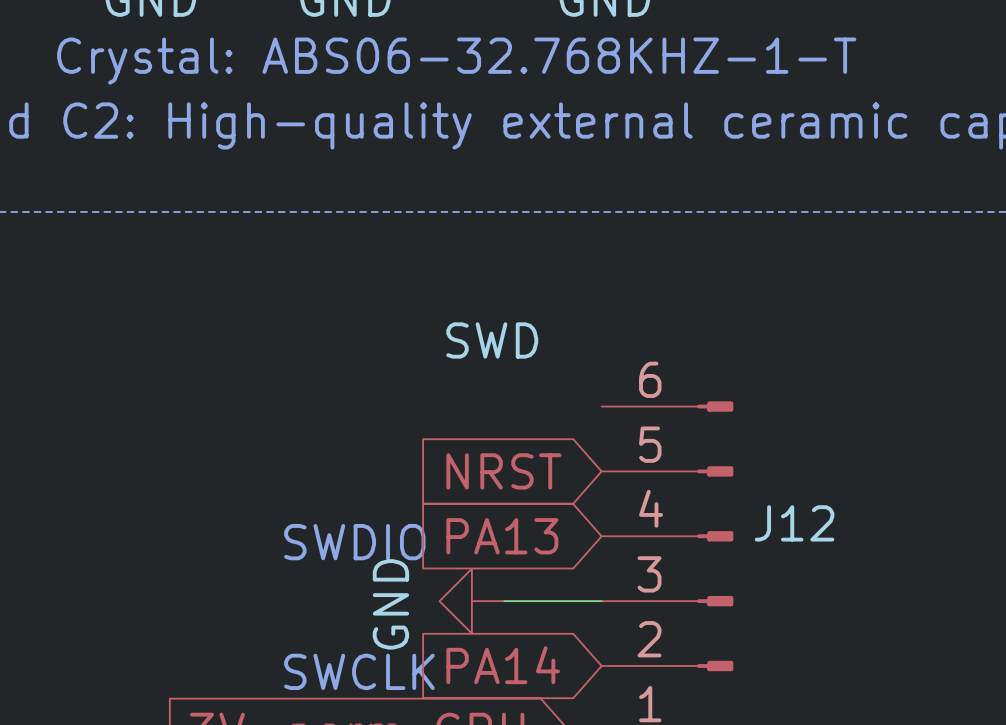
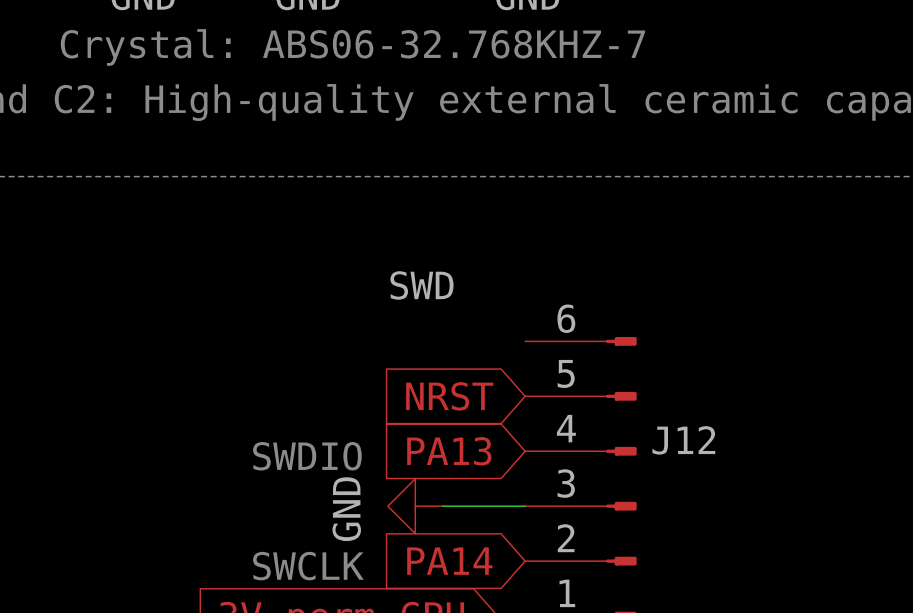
text: Crystal: ABS06-32.768KHZ-1-T (456, 61) -> Crystal: ABS06-32.768KHZ-7 (352, 47)

